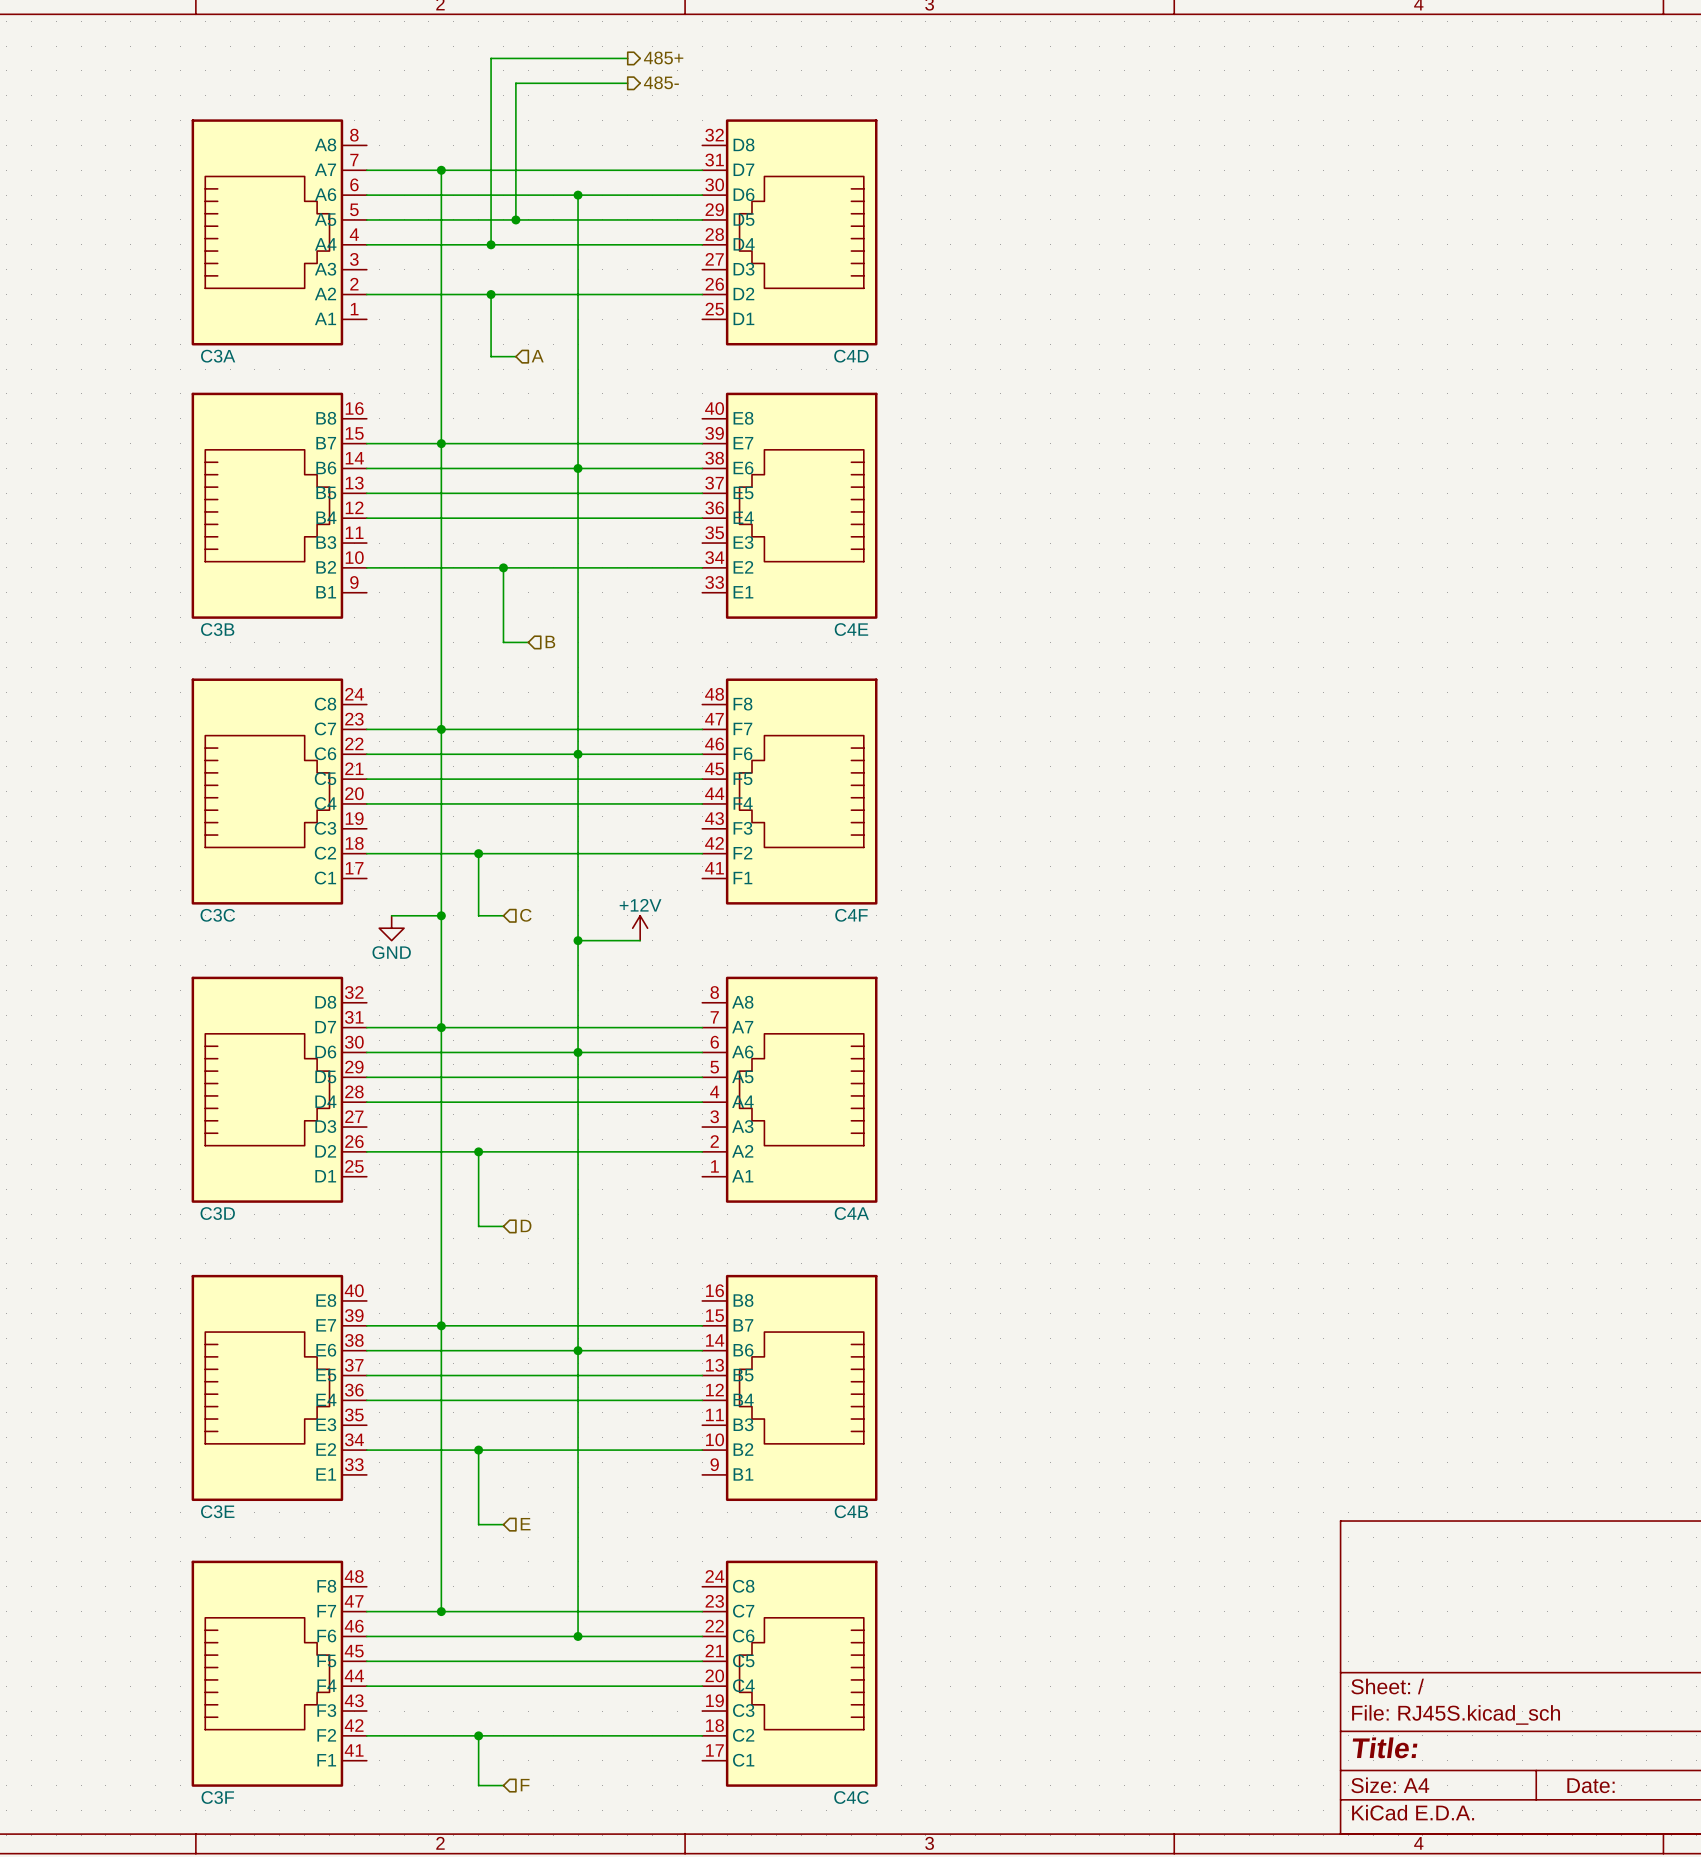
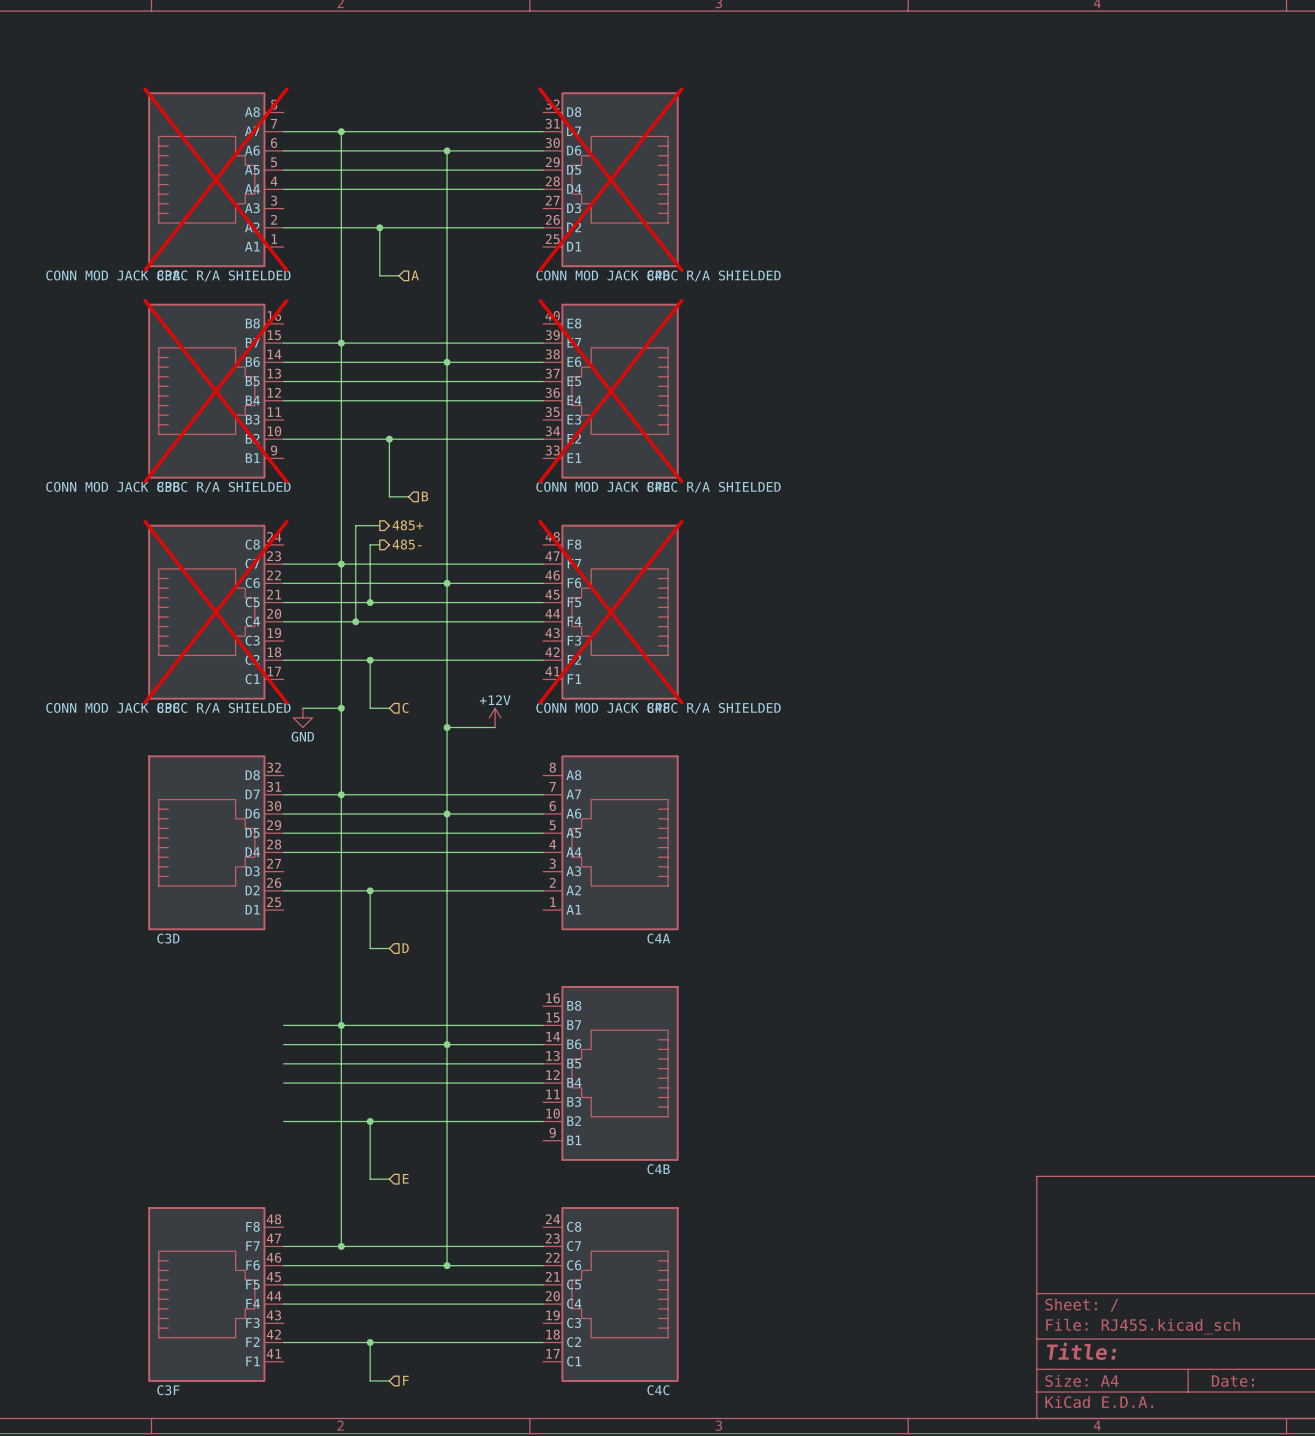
hierarchical label: 485+ (663, 57) -> none
wire: (627, 58) (491, 58) (491, 244) -> none
hierarchical label: 485- (661, 82) -> none
wire: (627, 83) (515, 83) (515, 219) -> none
junction: (515, 219) -> none
C3A do-not-place cross: none -> (215, 179)
C4D do-not-place cross: none -> (610, 179)
junction: (491, 244) -> none
C3A value: none -> CONN MOD JACK 8P8C R/A SHIELDED (168, 276)
C4D value: none -> CONN MOD JACK 8P8C R/A SHIELDED (658, 276)
C3B do-not-place cross: none -> (215, 391)
C4E do-not-place cross: none -> (610, 391)
C3B value: none -> CONN MOD JACK 8P8C R/A SHIELDED (168, 487)
C4E value: none -> CONN MOD JACK 8P8C R/A SHIELDED (658, 487)
wire: none -> (379, 525) (355, 525) (355, 621)
hierarchical label: none -> 485+ (407, 525)
wire: none -> (379, 544) (370, 544) (370, 602)
hierarchical label: none -> 485- (407, 544)
junction: none -> (370, 602)
C3C do-not-place cross: none -> (215, 612)
C4F do-not-place cross: none -> (610, 612)
junction: none -> (355, 621)
C3C value: none -> CONN MOD JACK 8P8C R/A SHIELDED (168, 708)
C4F value: none -> CONN MOD JACK 8P8C R/A SHIELDED (658, 708)
C3E: (279, 1387) -> none

